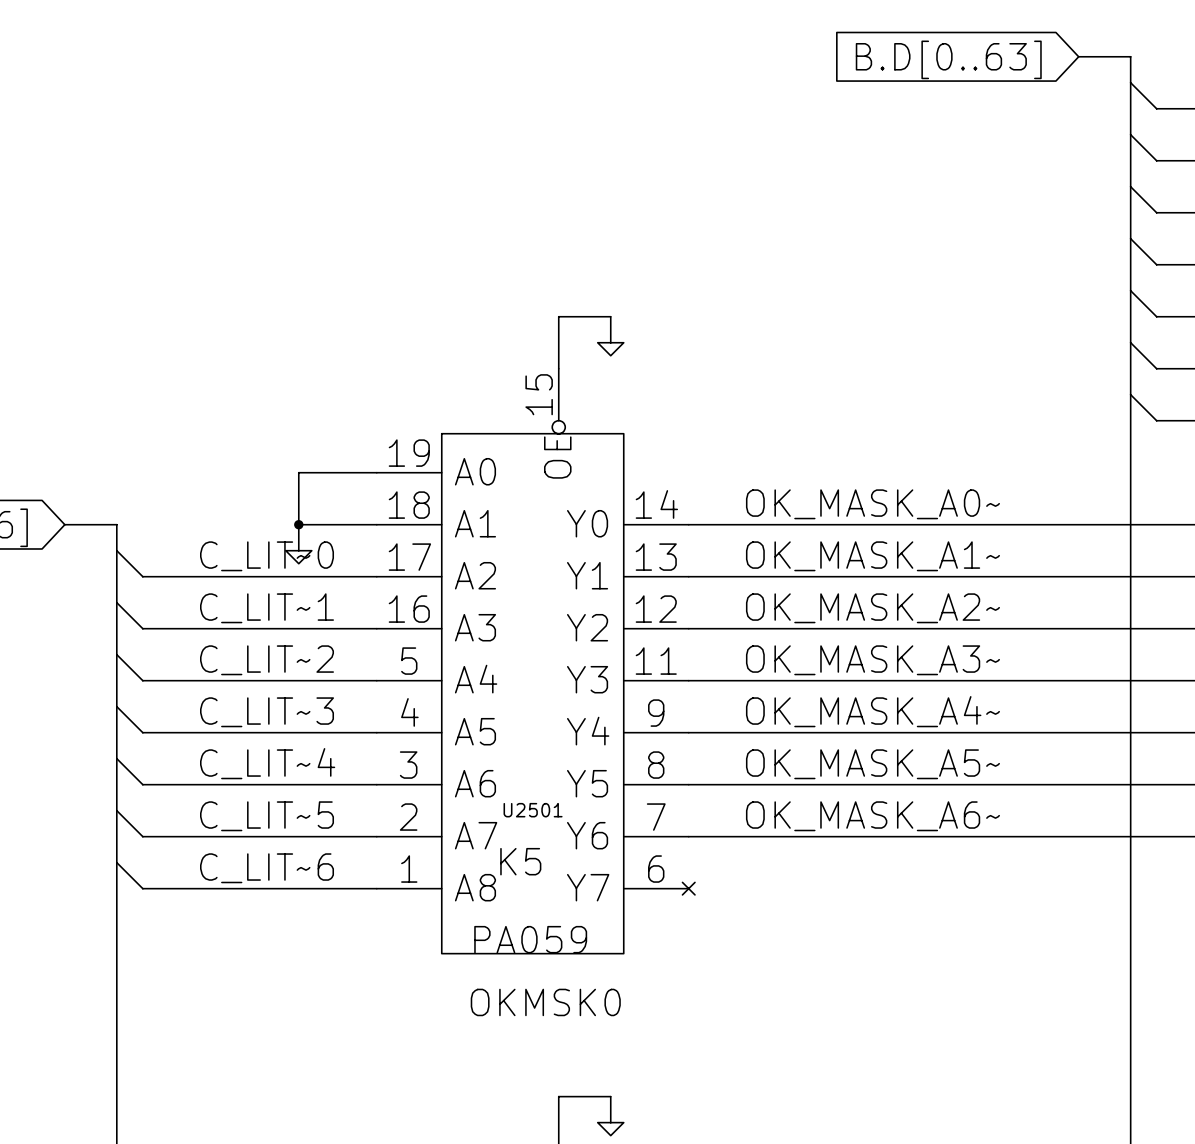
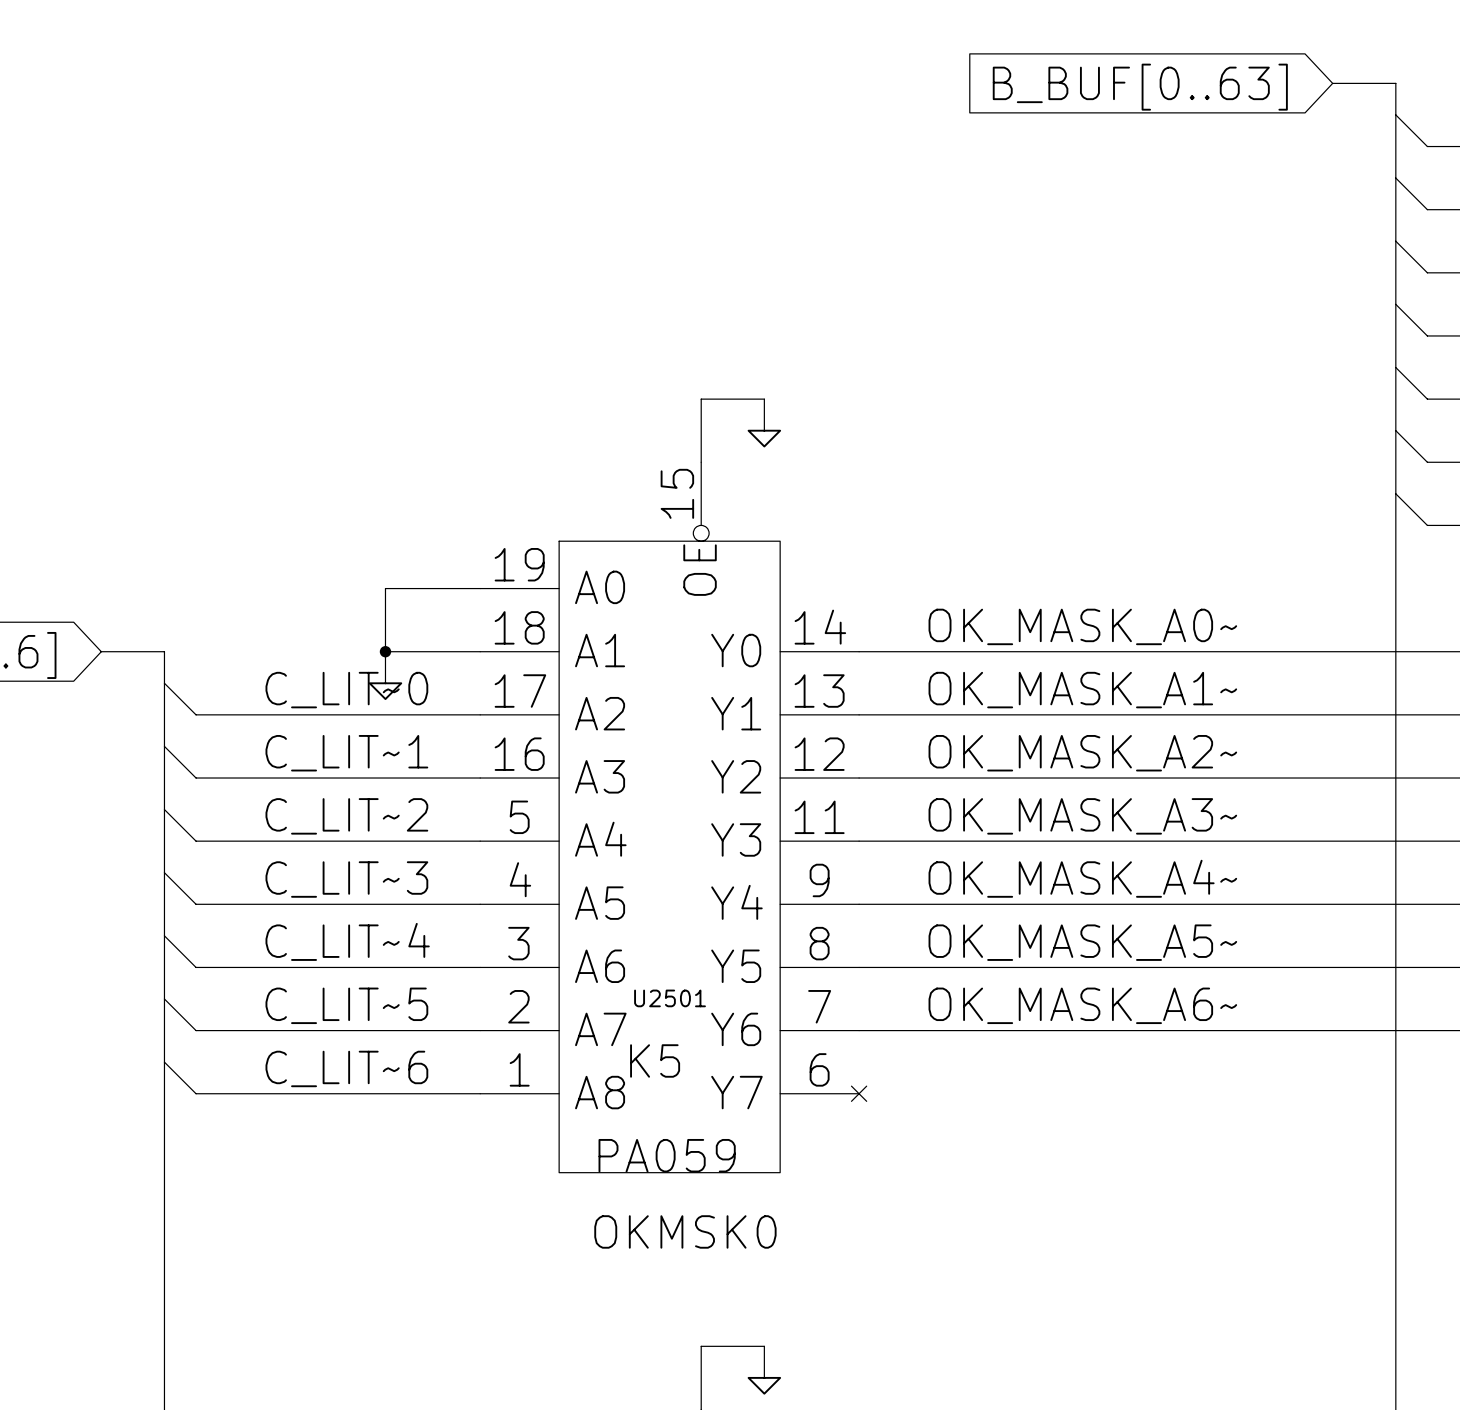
global label: B.D[0..63] (948, 59) -> B_BUF[0..63] (1140, 87)

